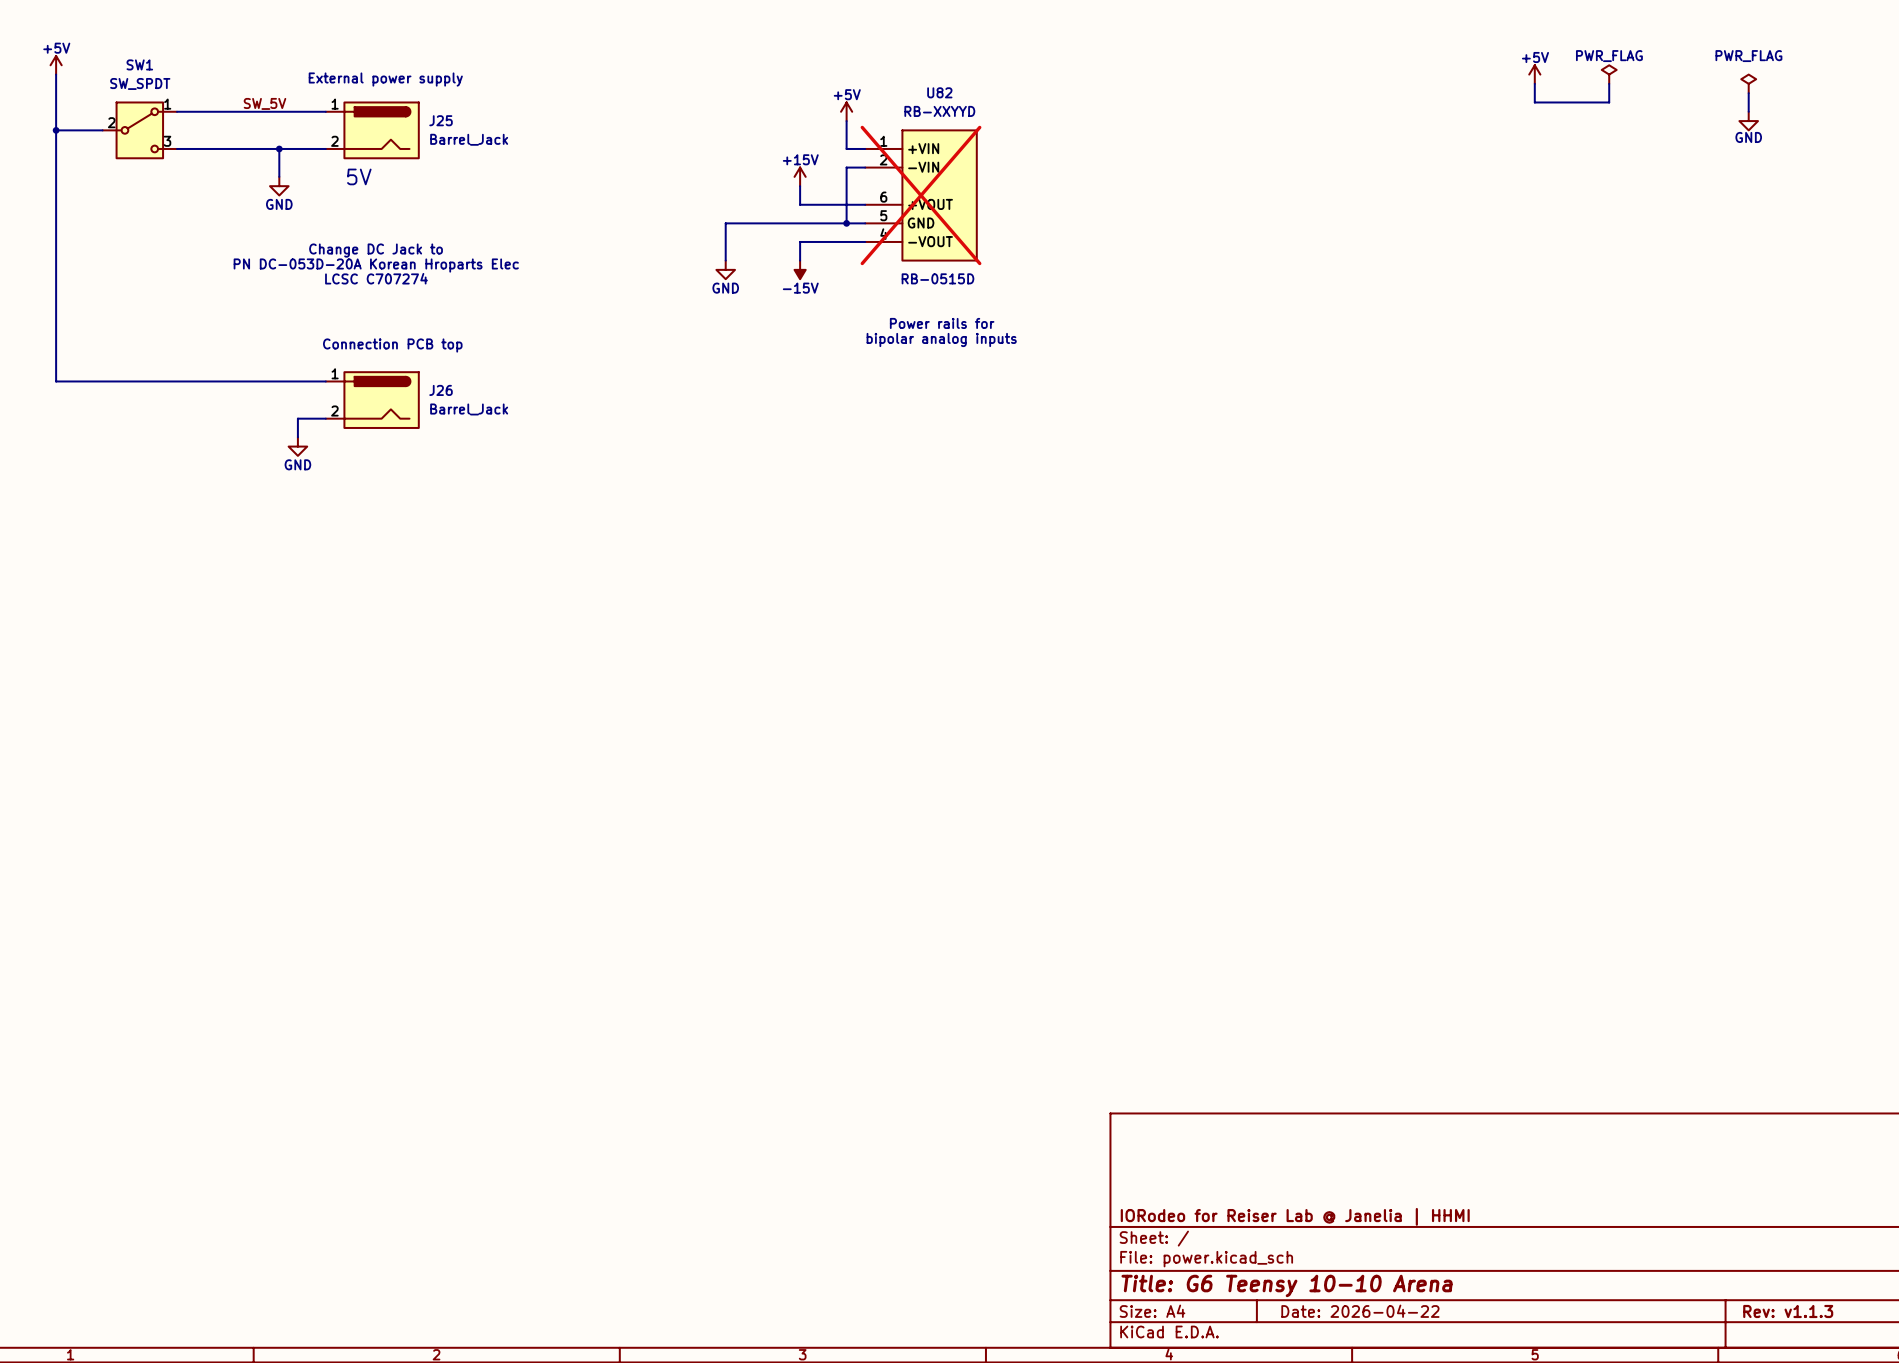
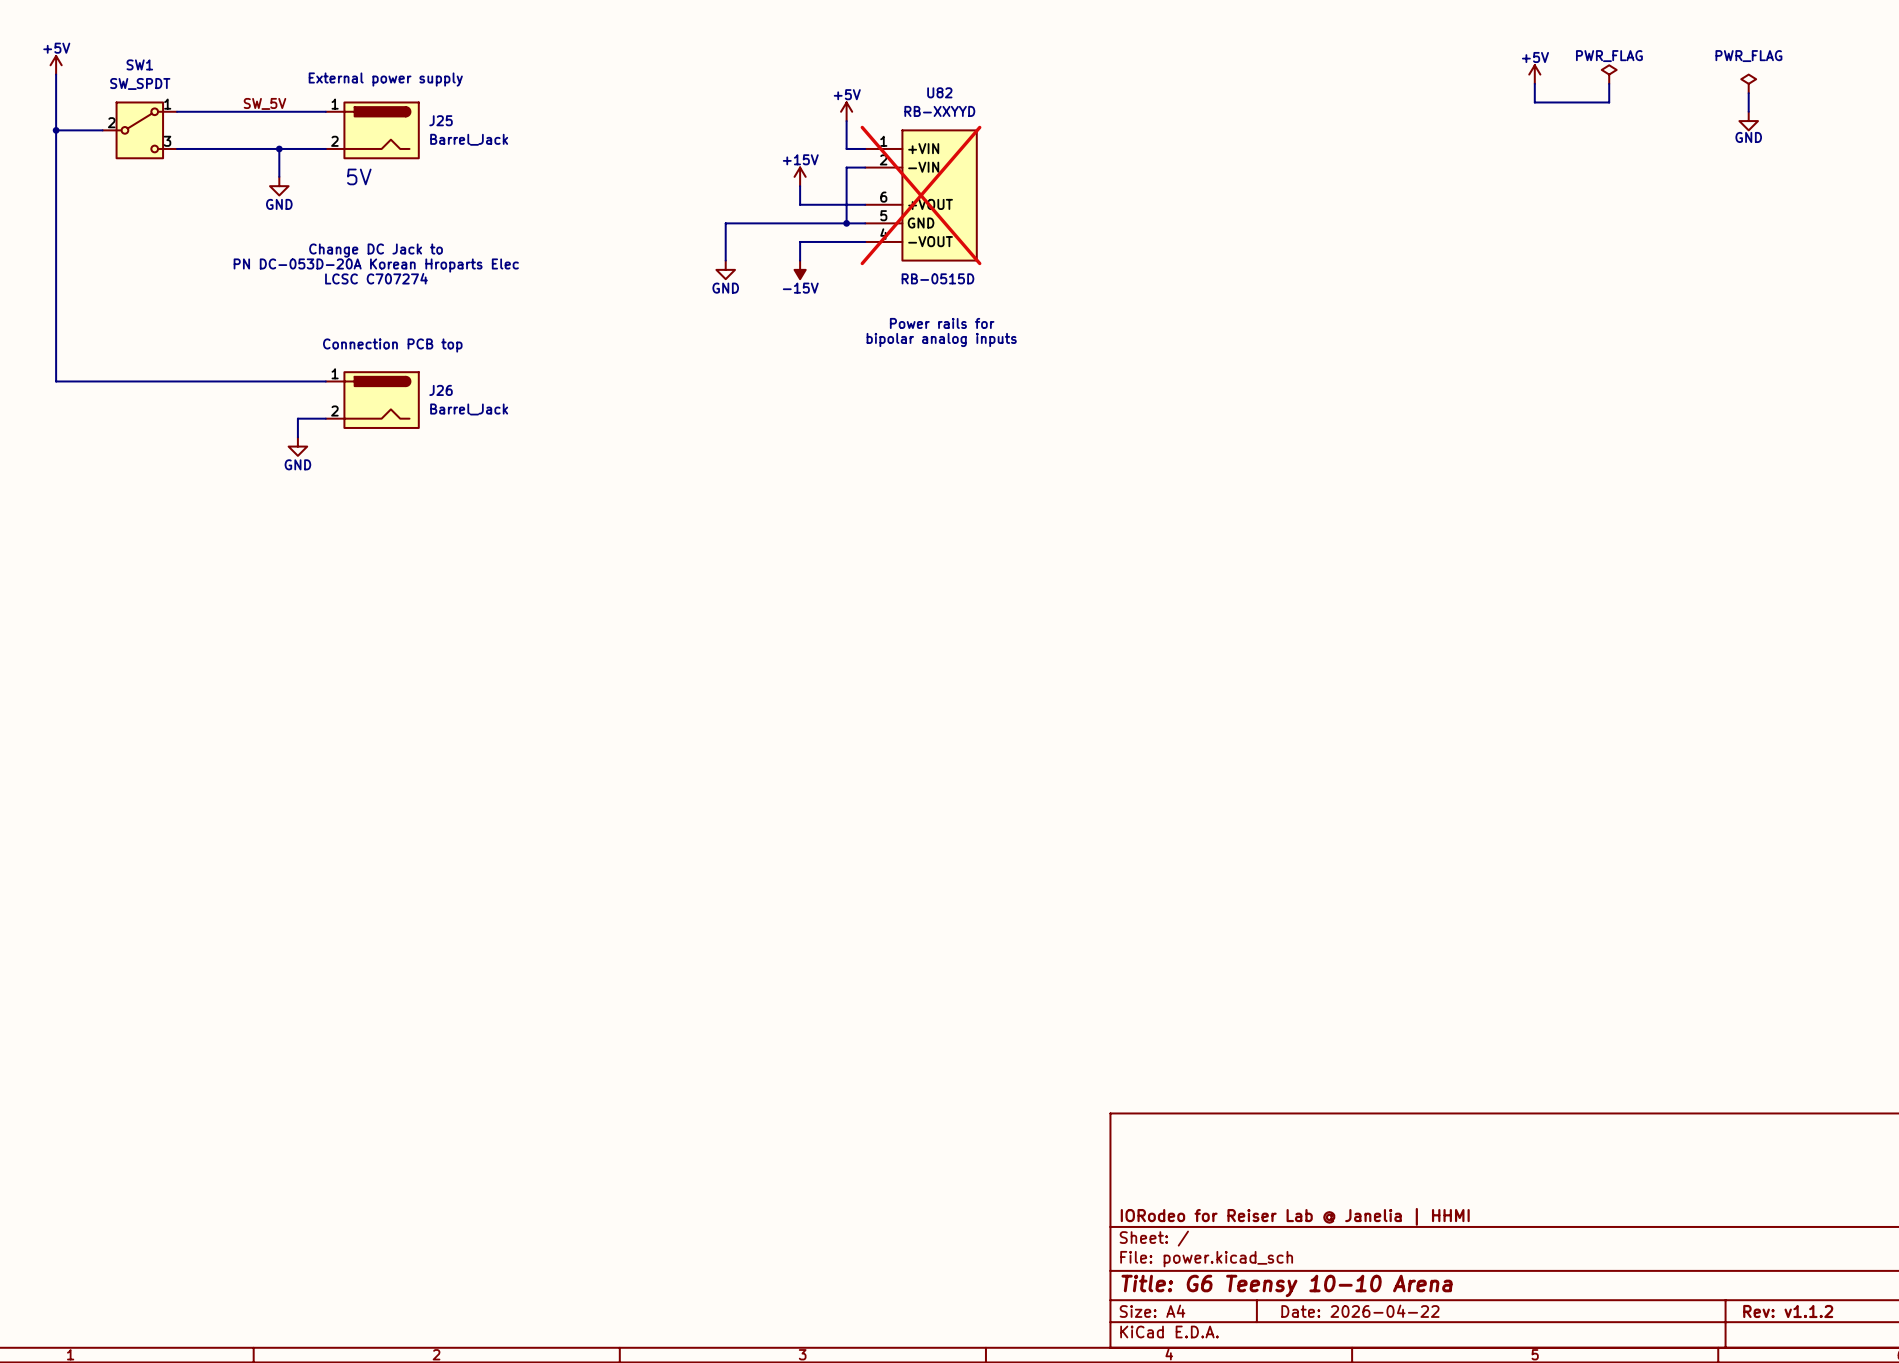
title block: Rev: v1.1.3 (1788, 1311) -> Rev: v1.1.2 (1788, 1311)

